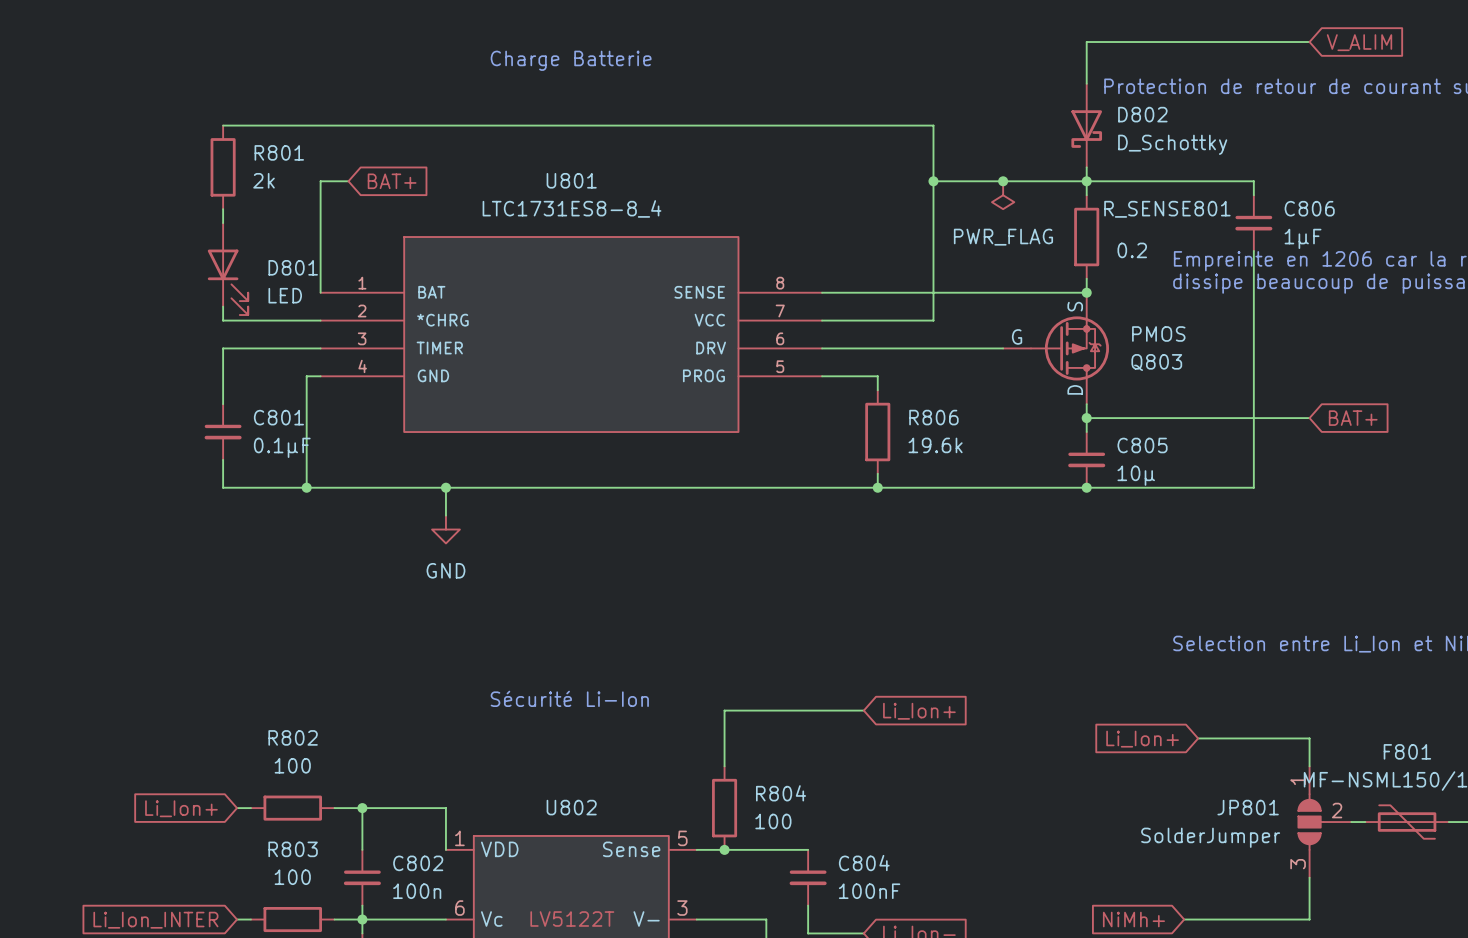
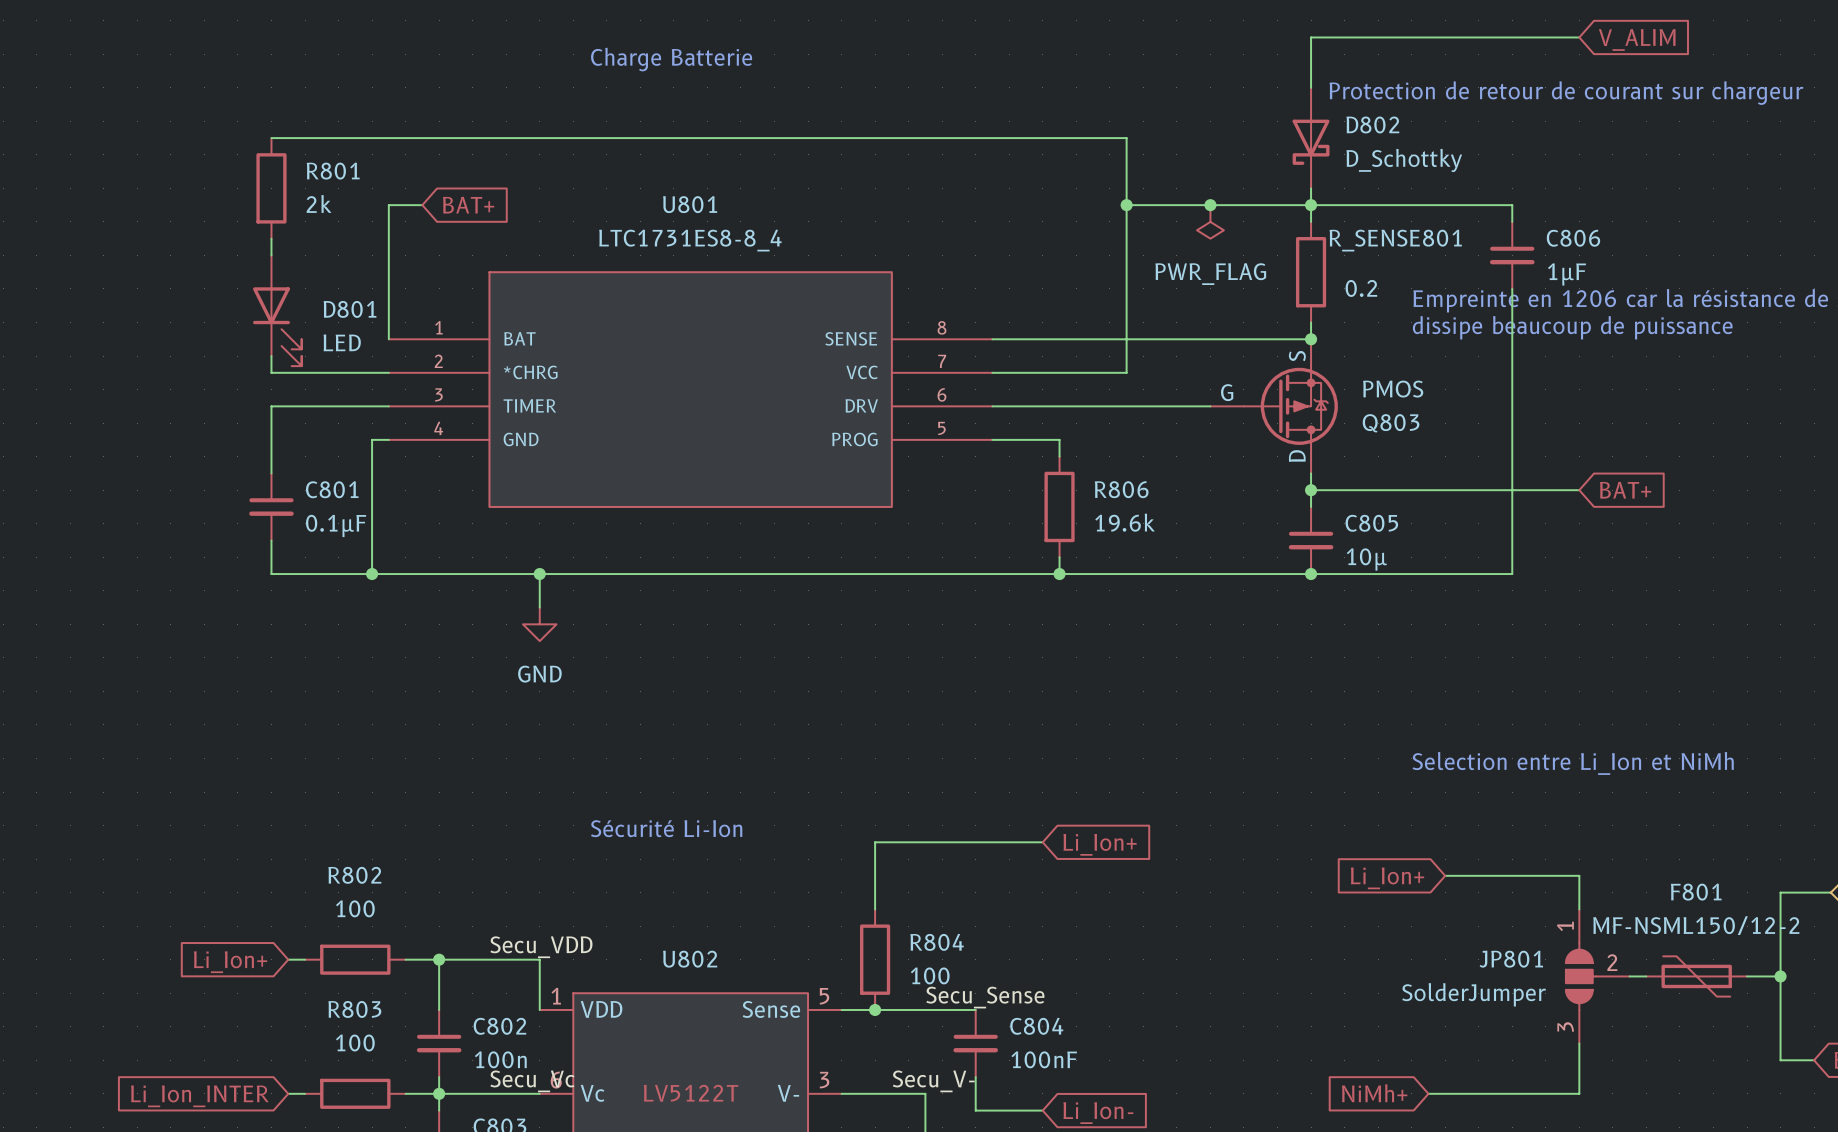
label: none -> Secu_VDD (541, 947)
label: none -> Secu_Sense (985, 997)
label: none -> Secu_Vc (532, 1081)
label: none -> Secu_V- (933, 1081)

